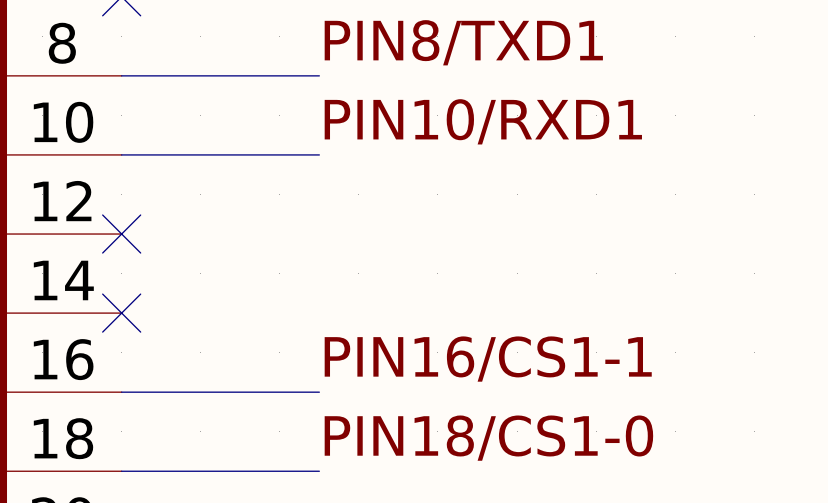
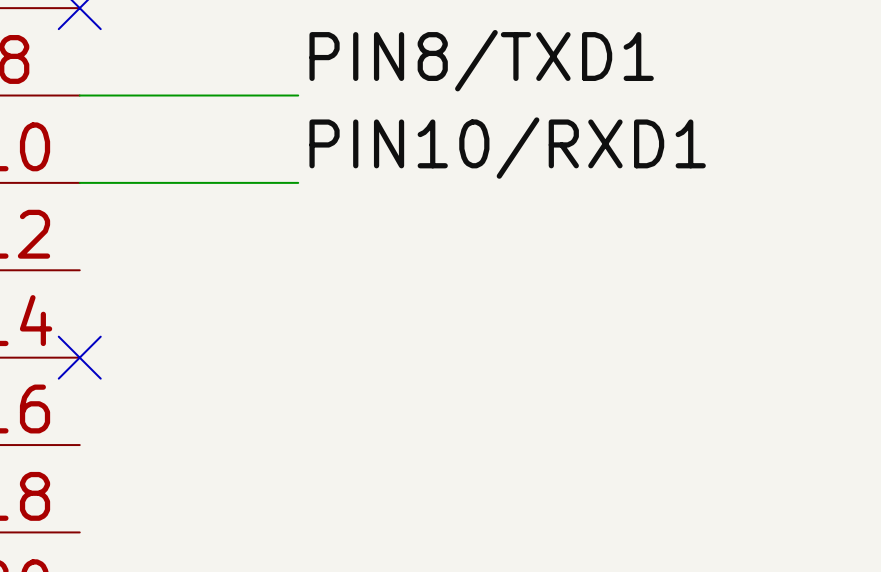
no-connect mark: (121, 234) -> none
label: PIN16/CS1-1 (488, 359) -> none
wire: (121, 392) (319, 392) -> none
label: PIN18/CS1-0 (488, 438) -> none
wire: (121, 471) (319, 471) -> none

